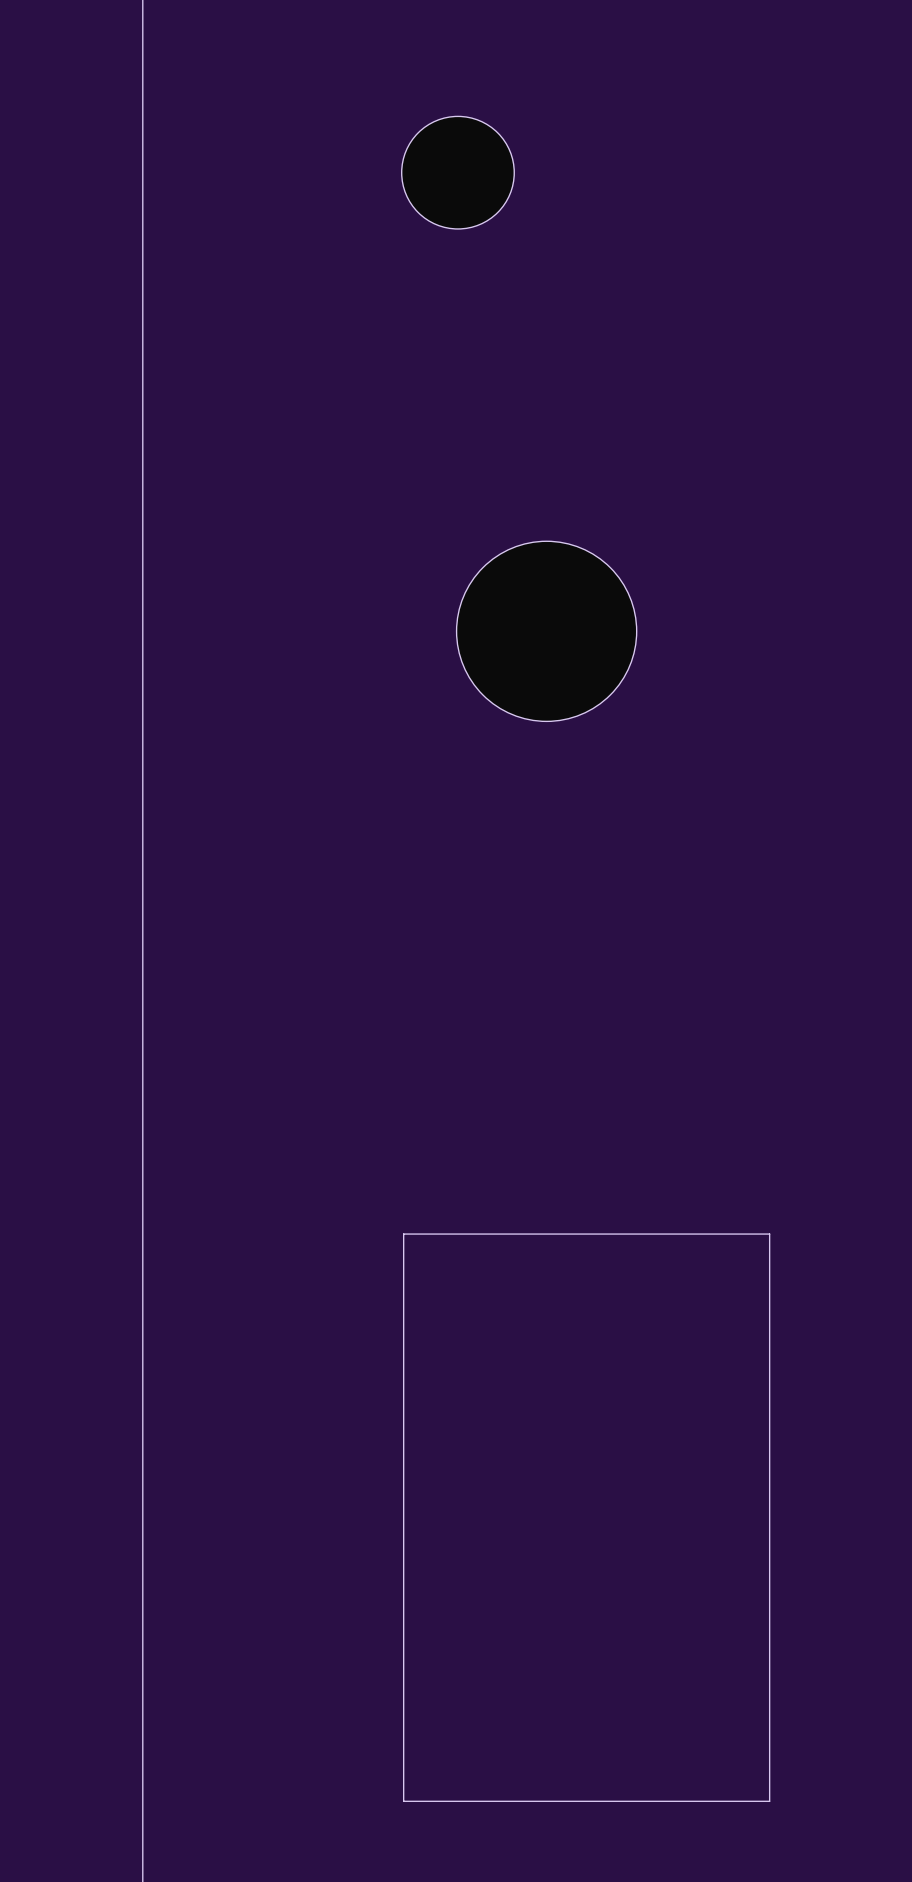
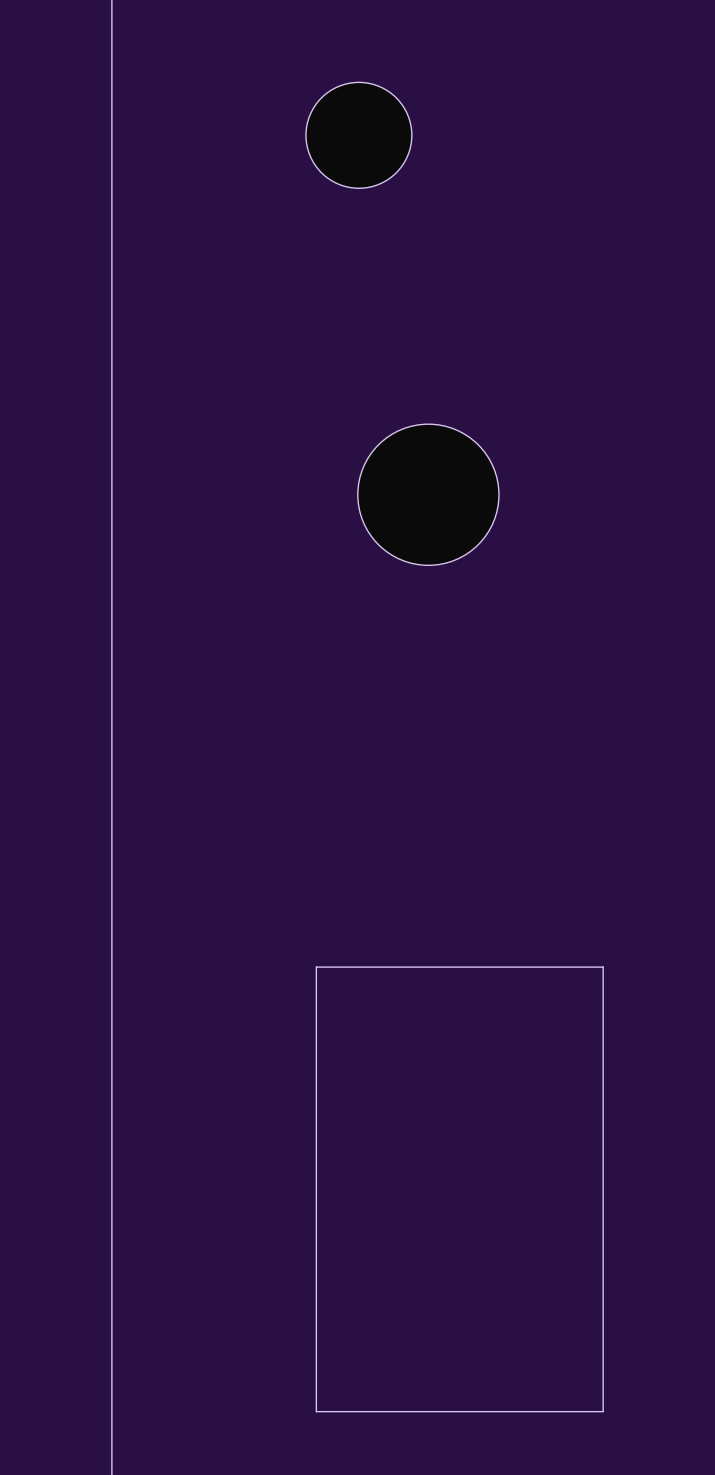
hole size: [401, 116, 515, 229] -> [305, 82, 412, 189]

